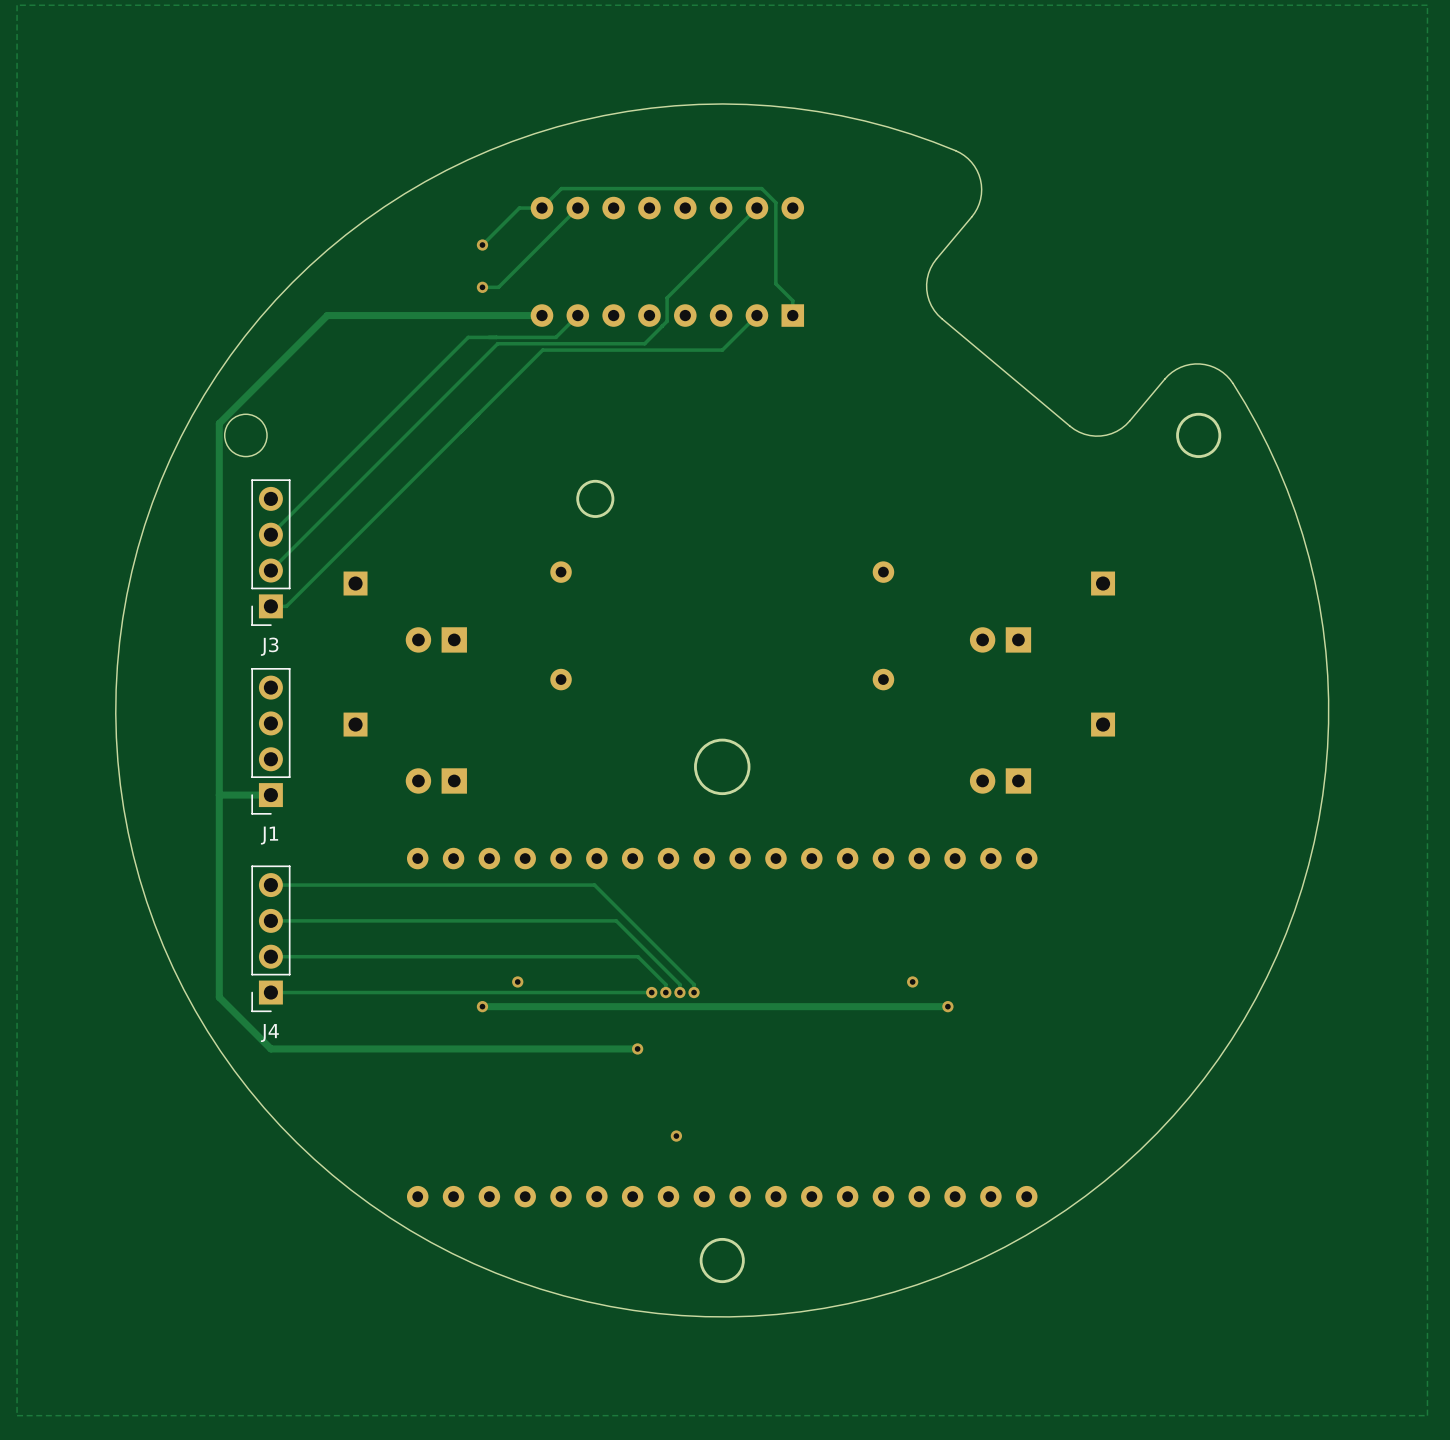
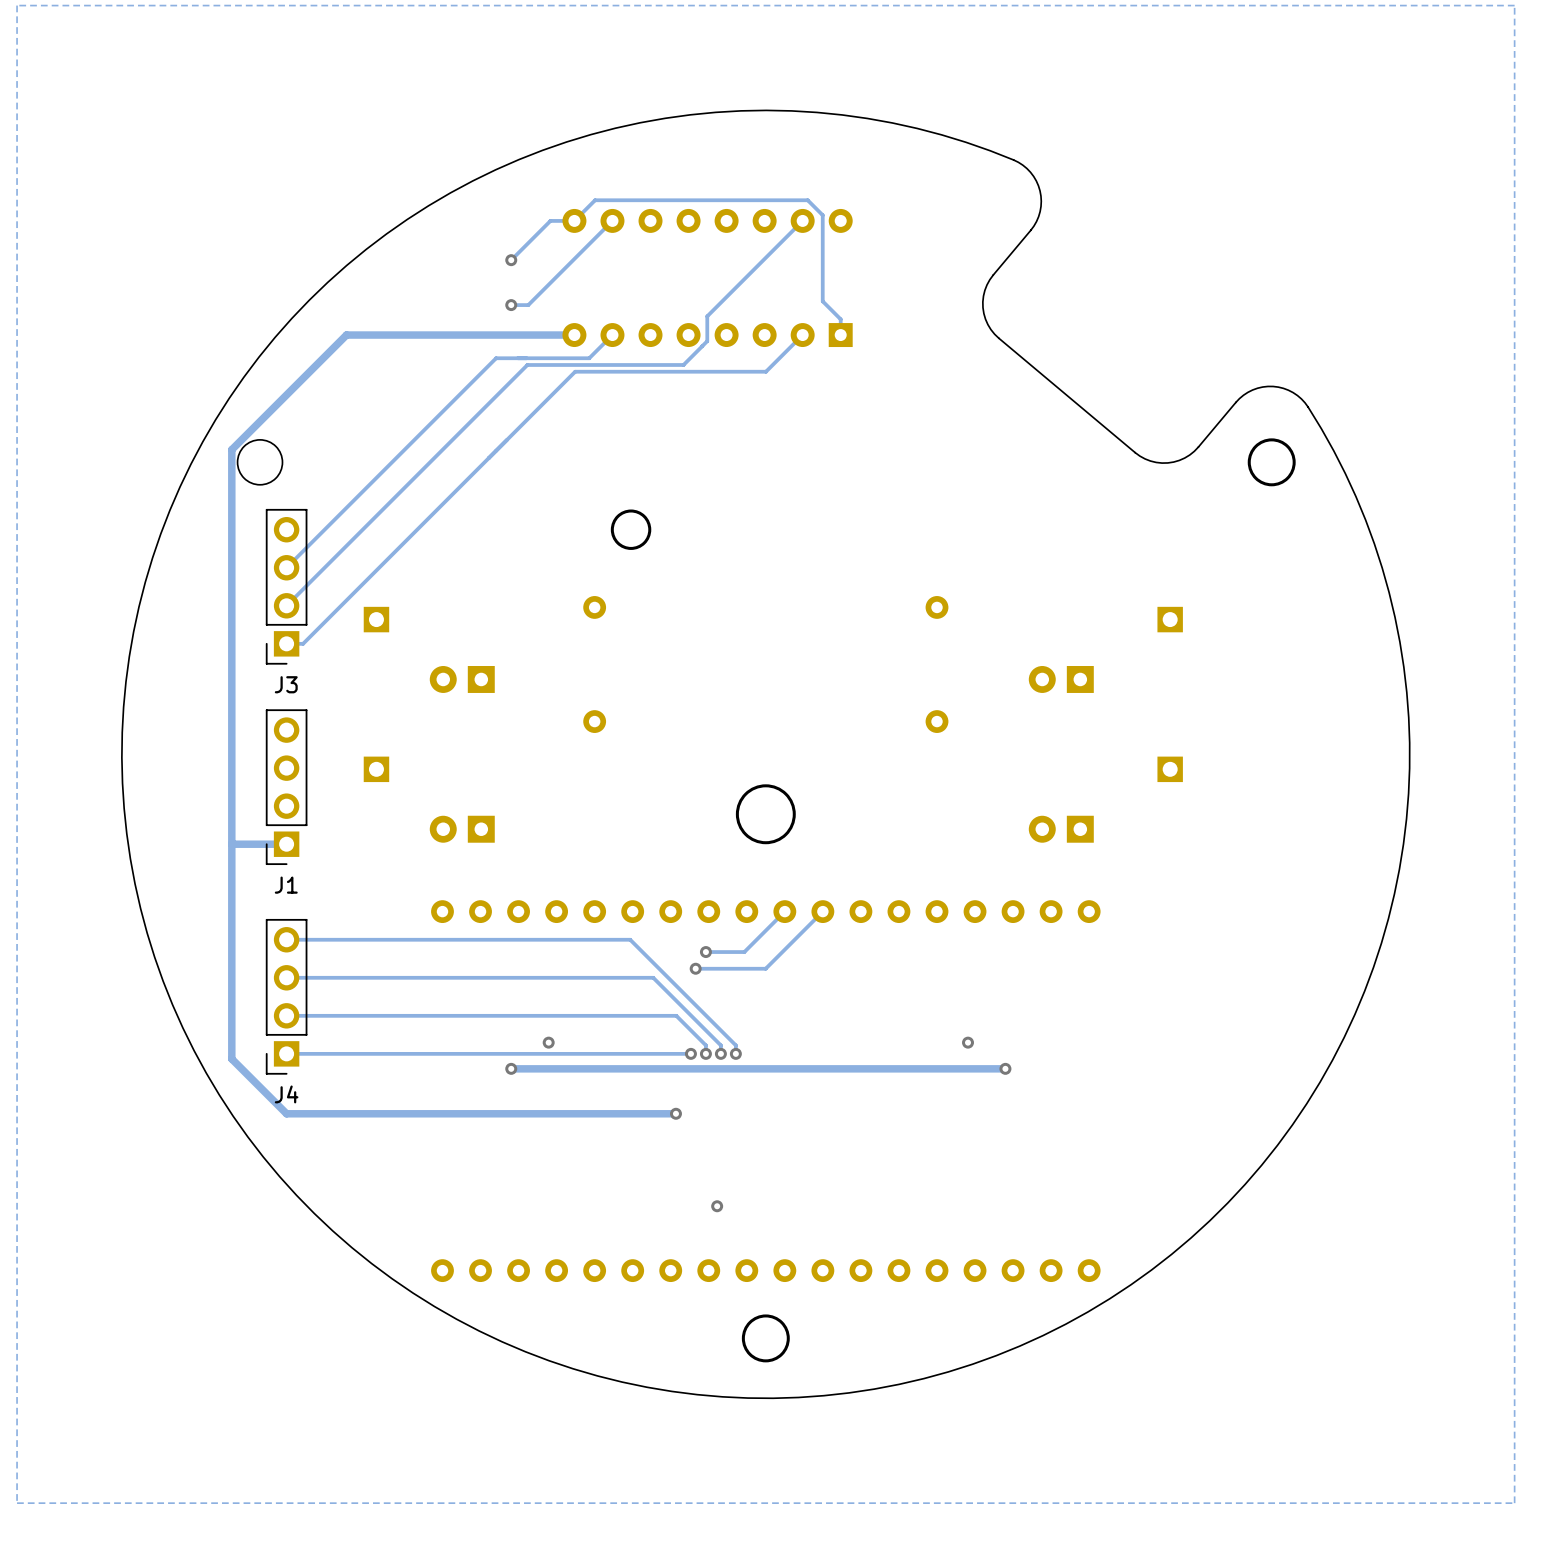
track: none -> (784, 911) (744, 952) (705, 952)
track: none -> (822, 911) (765, 968) (695, 968)
via: none -> (705, 952)
via: none -> (695, 968)

